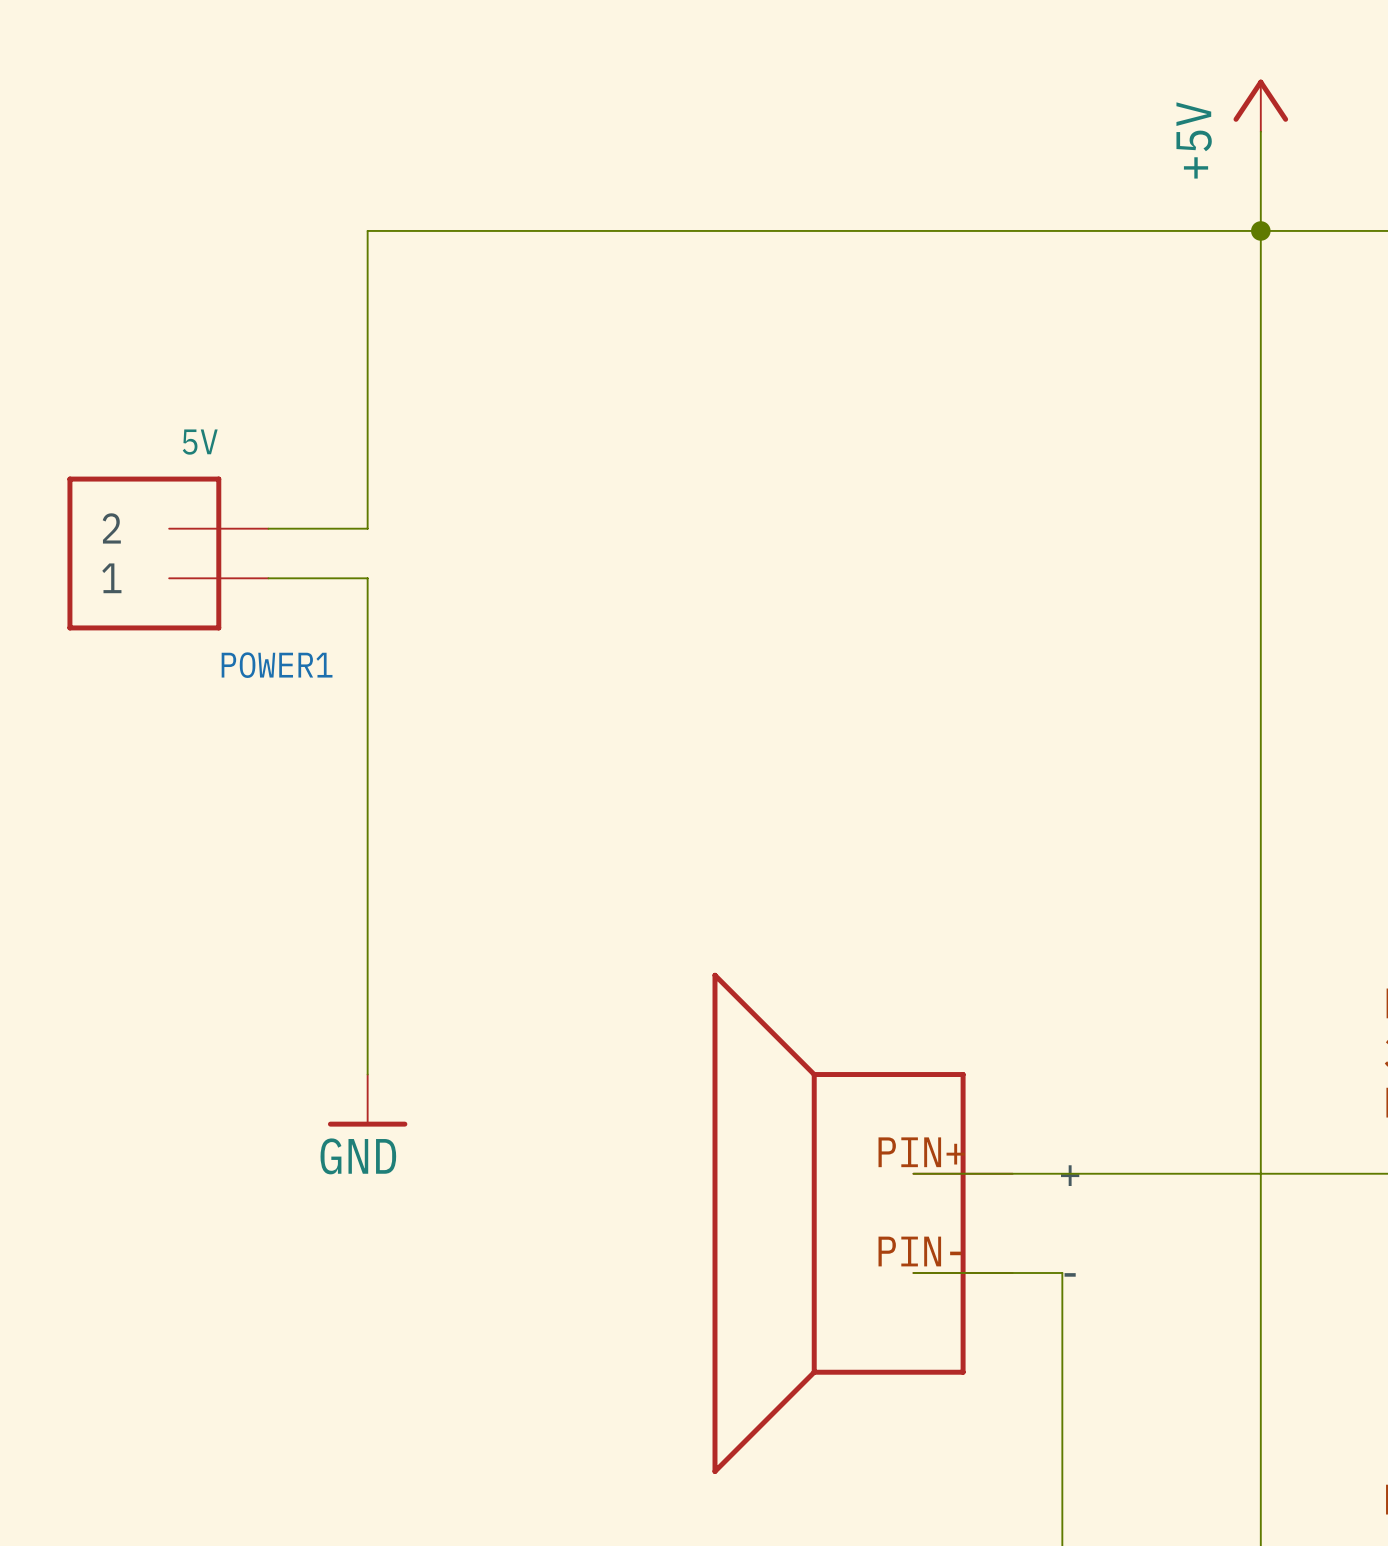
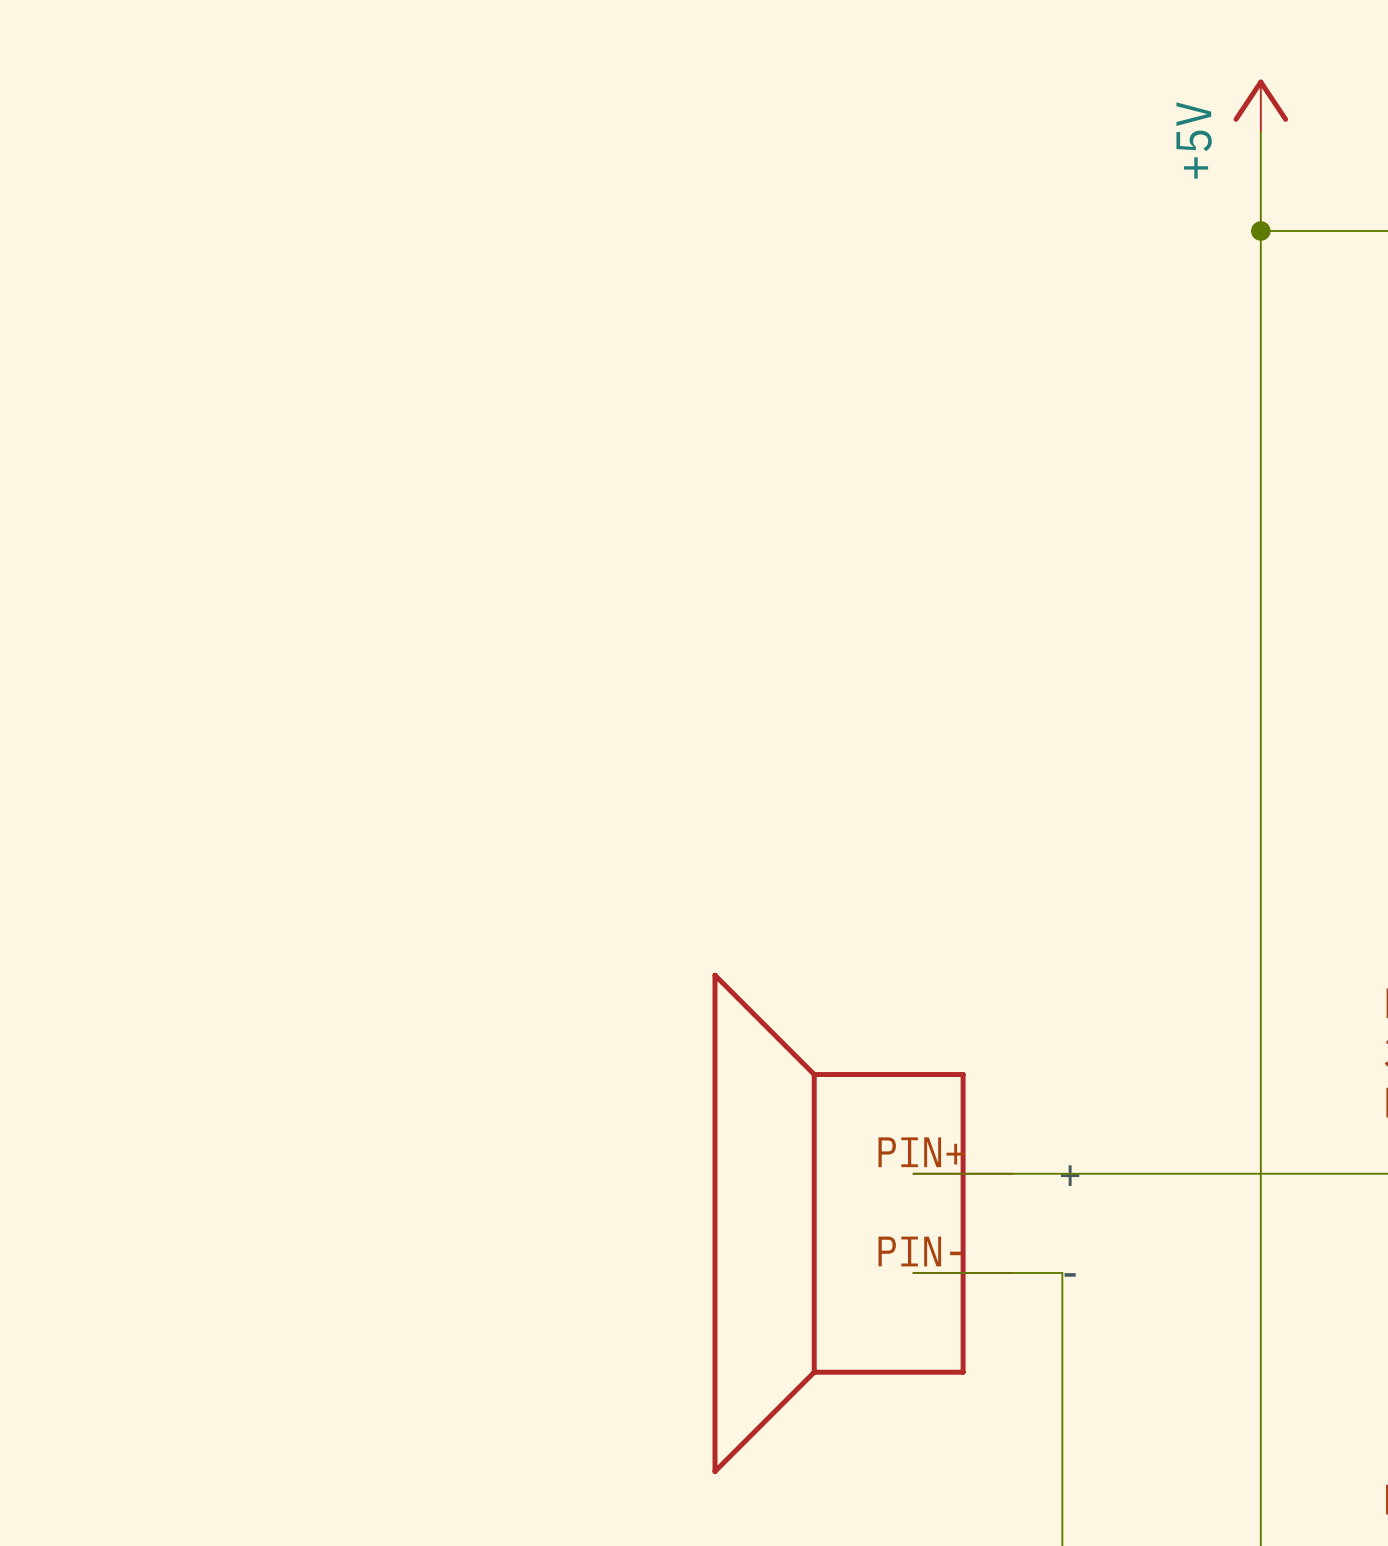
wire: (1260, 230) (367, 230) (367, 528) (268, 528) -> none
POWER1: 5V (167, 553) -> none
wire: (268, 578) (367, 578) (367, 1074) -> none
power symbol: GND (367, 1100) -> none

